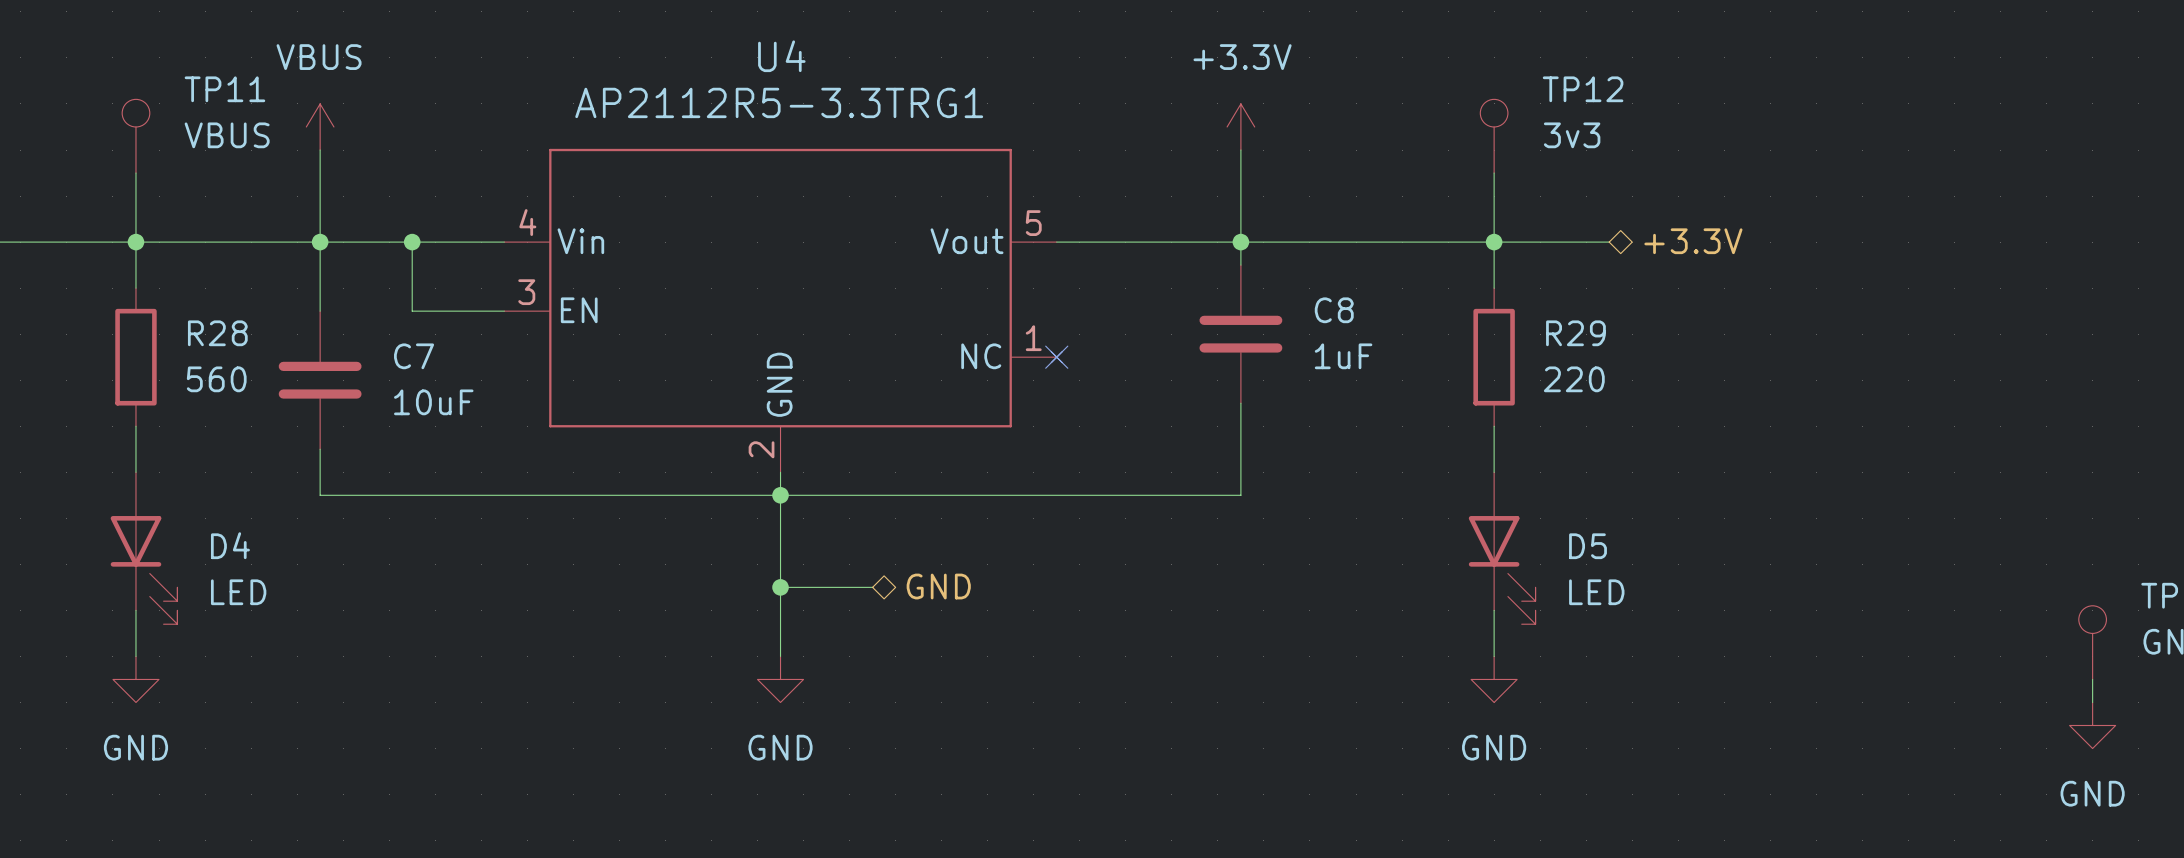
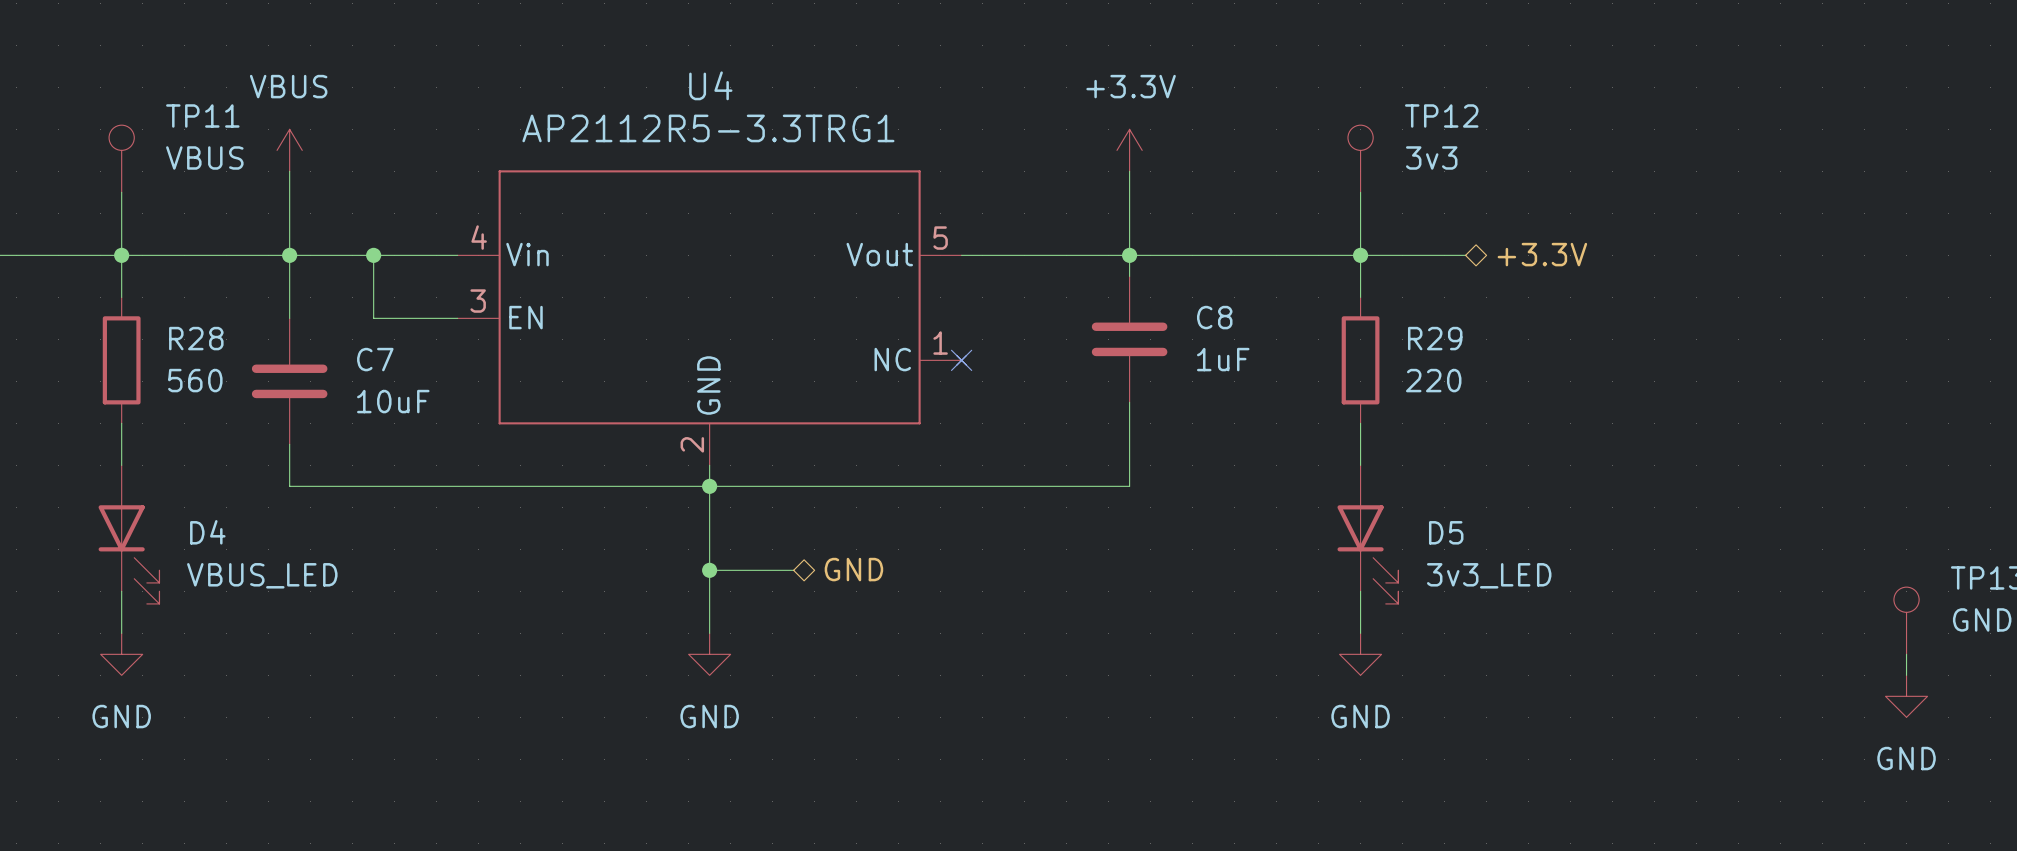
D4 value: LED (238, 592) -> VBUS_LED (262, 575)
D5 value: LED (1596, 592) -> 3v3_LED (1489, 575)

